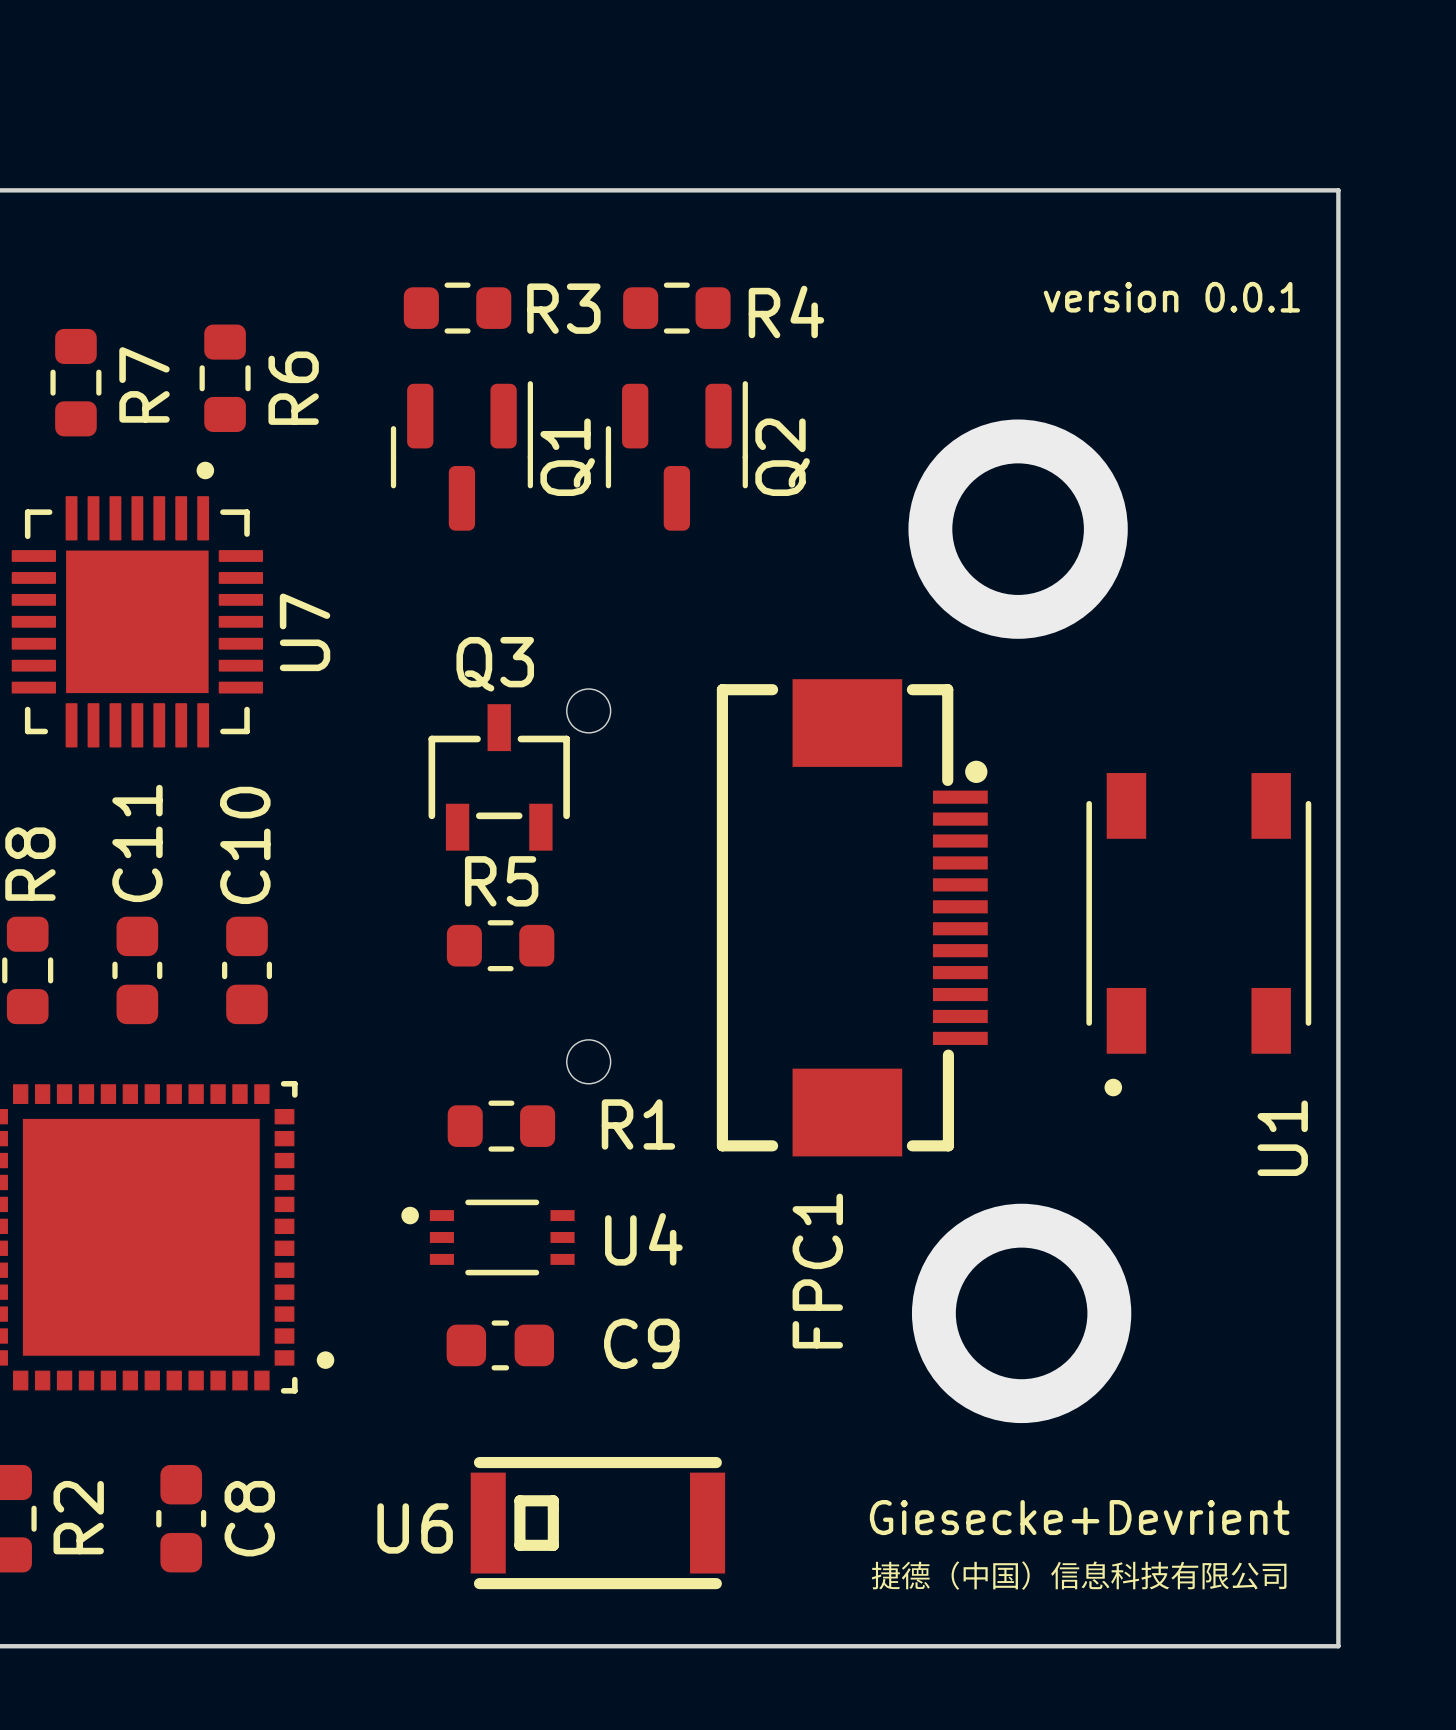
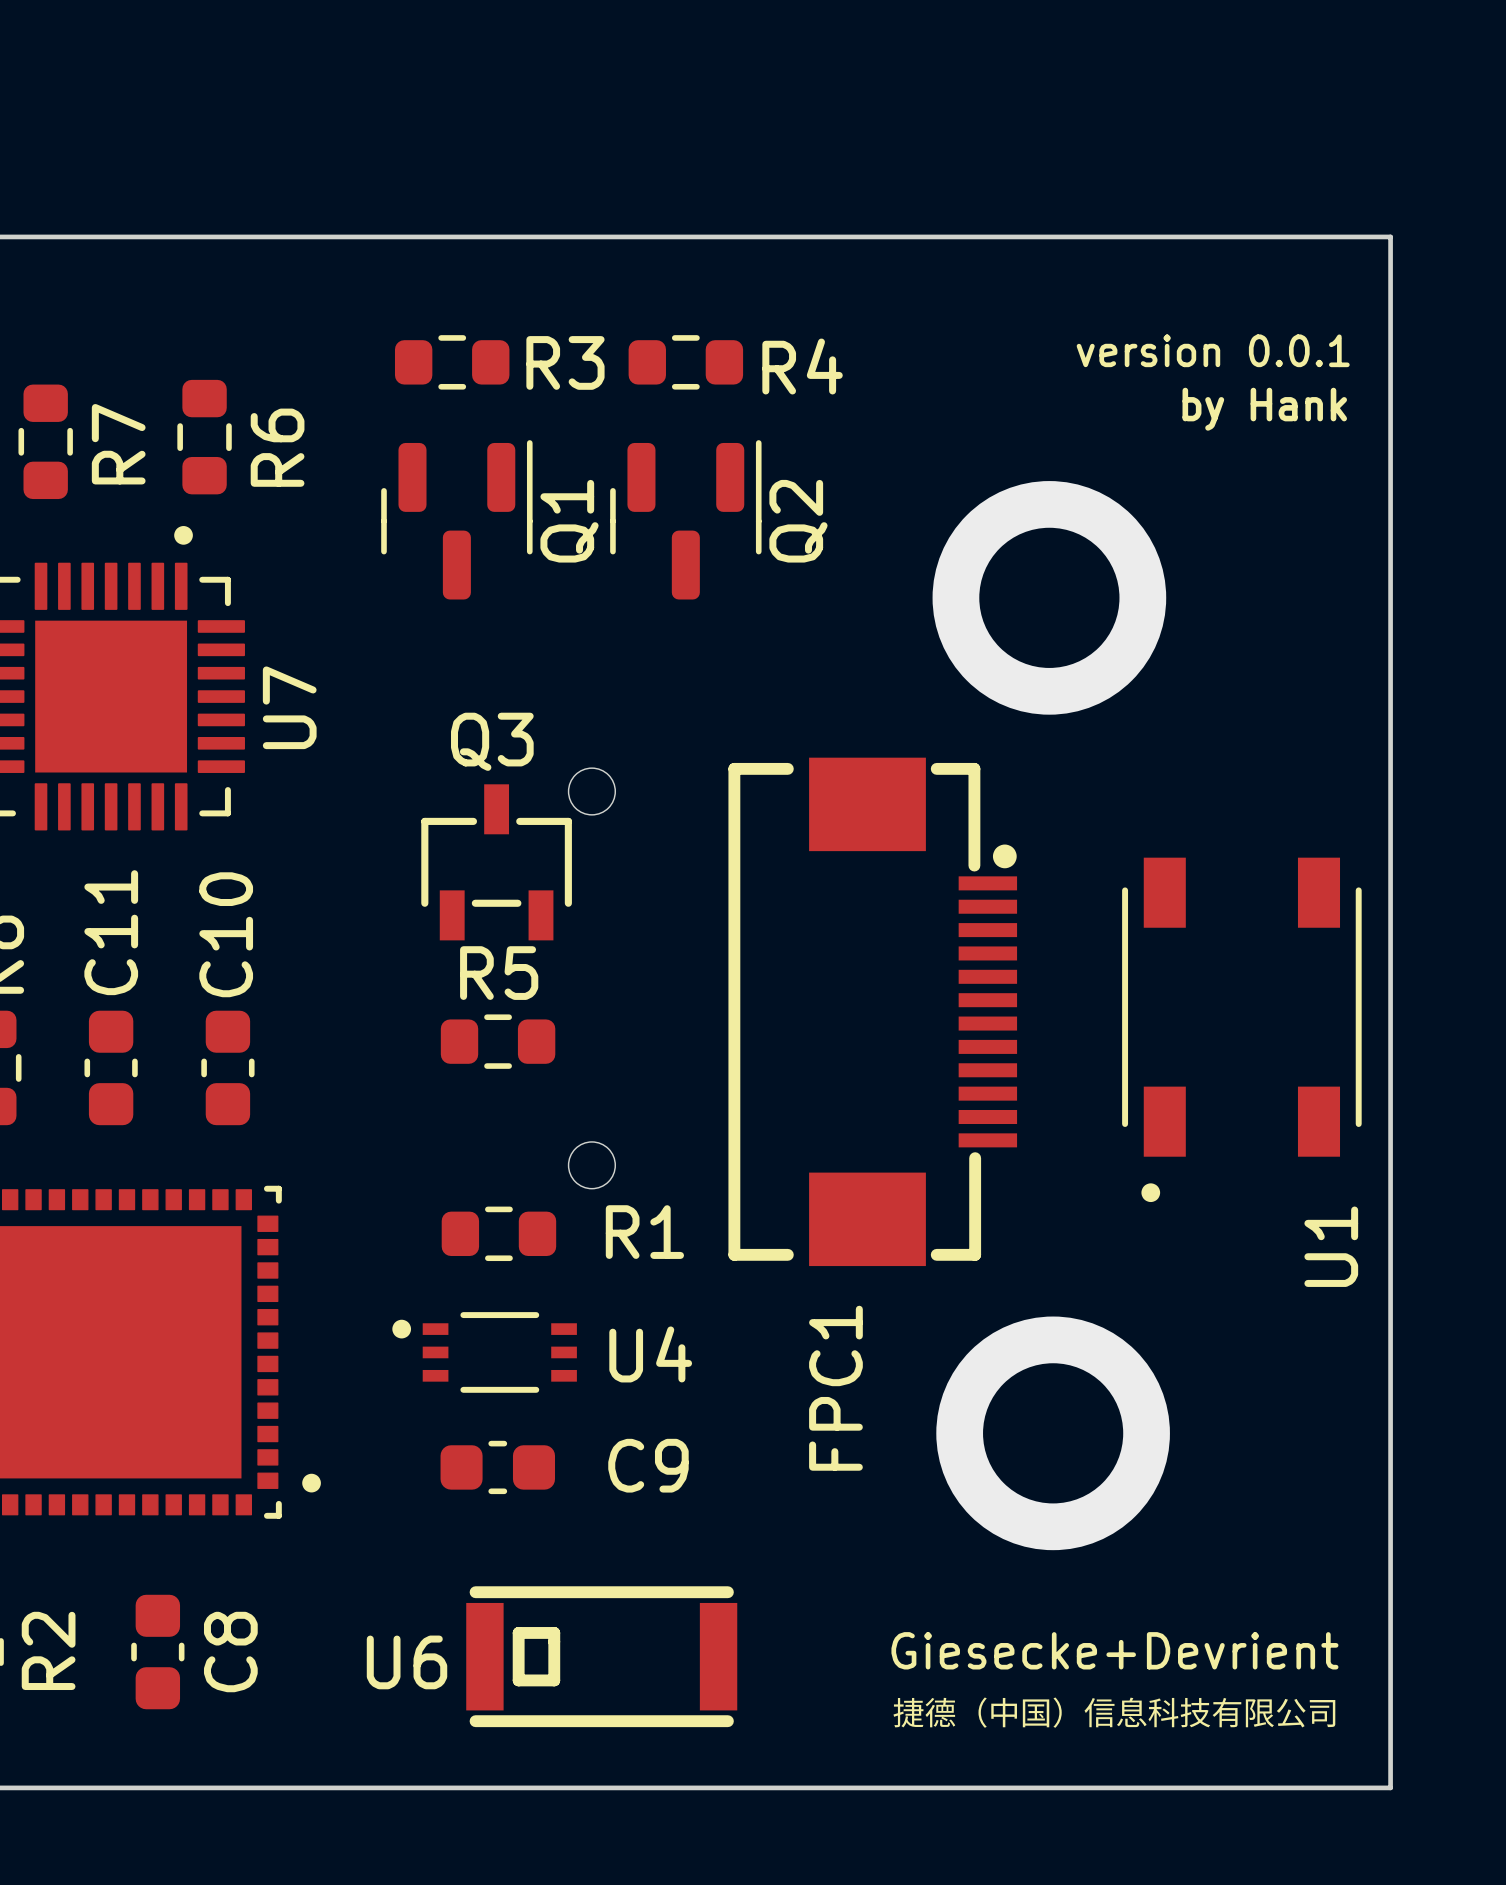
text: none -> by Hank (1264, 409)

